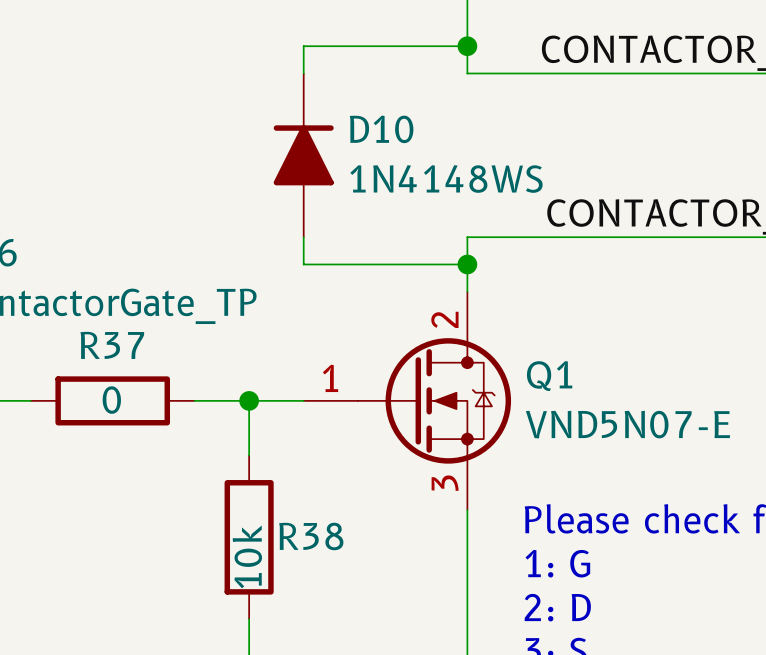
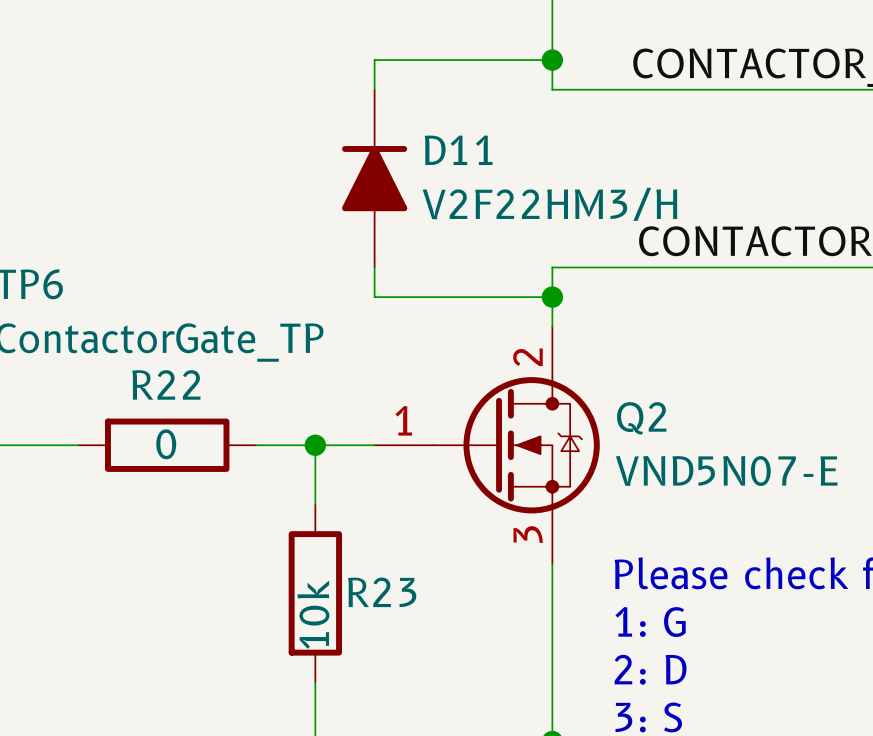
D10 name: D10 (381, 129) -> D11 (458, 150)
D10 value: 1N4148WS (446, 179) -> V2F22HM3/H (549, 204)
R37 name: R37 (112, 345) -> R22 (166, 384)
Q1 name: Q1 (549, 376) -> Q2 (641, 418)
R38 name: R38 (311, 536) -> R23 (382, 592)

